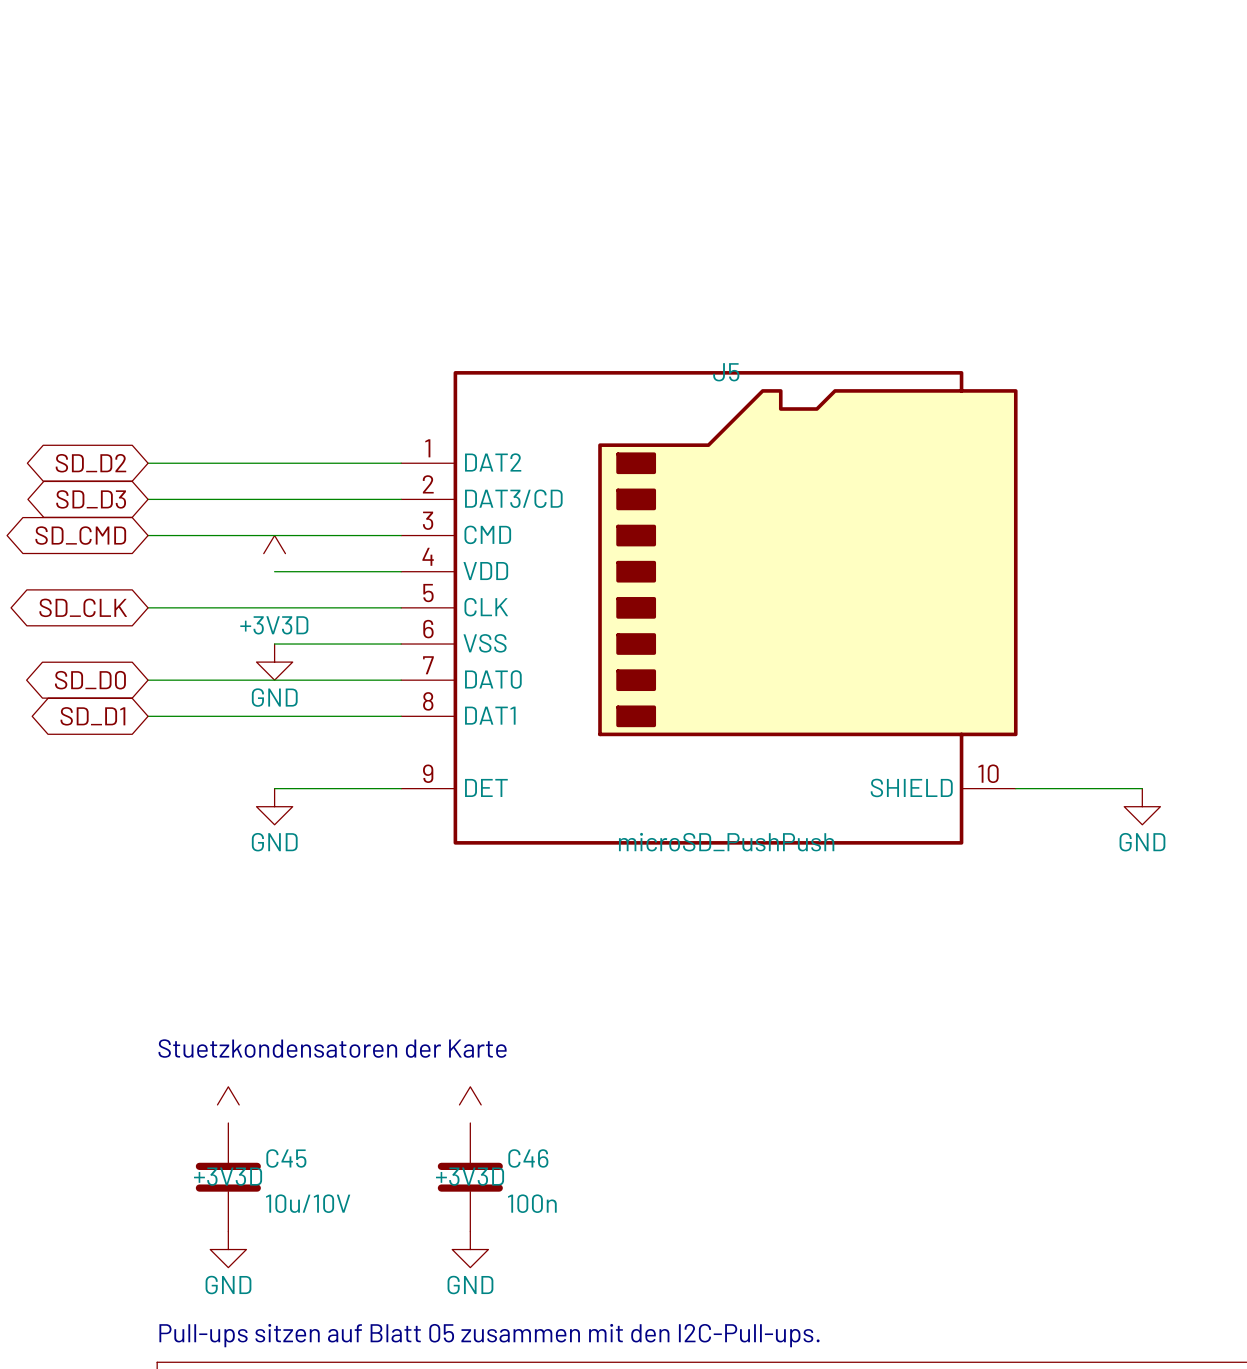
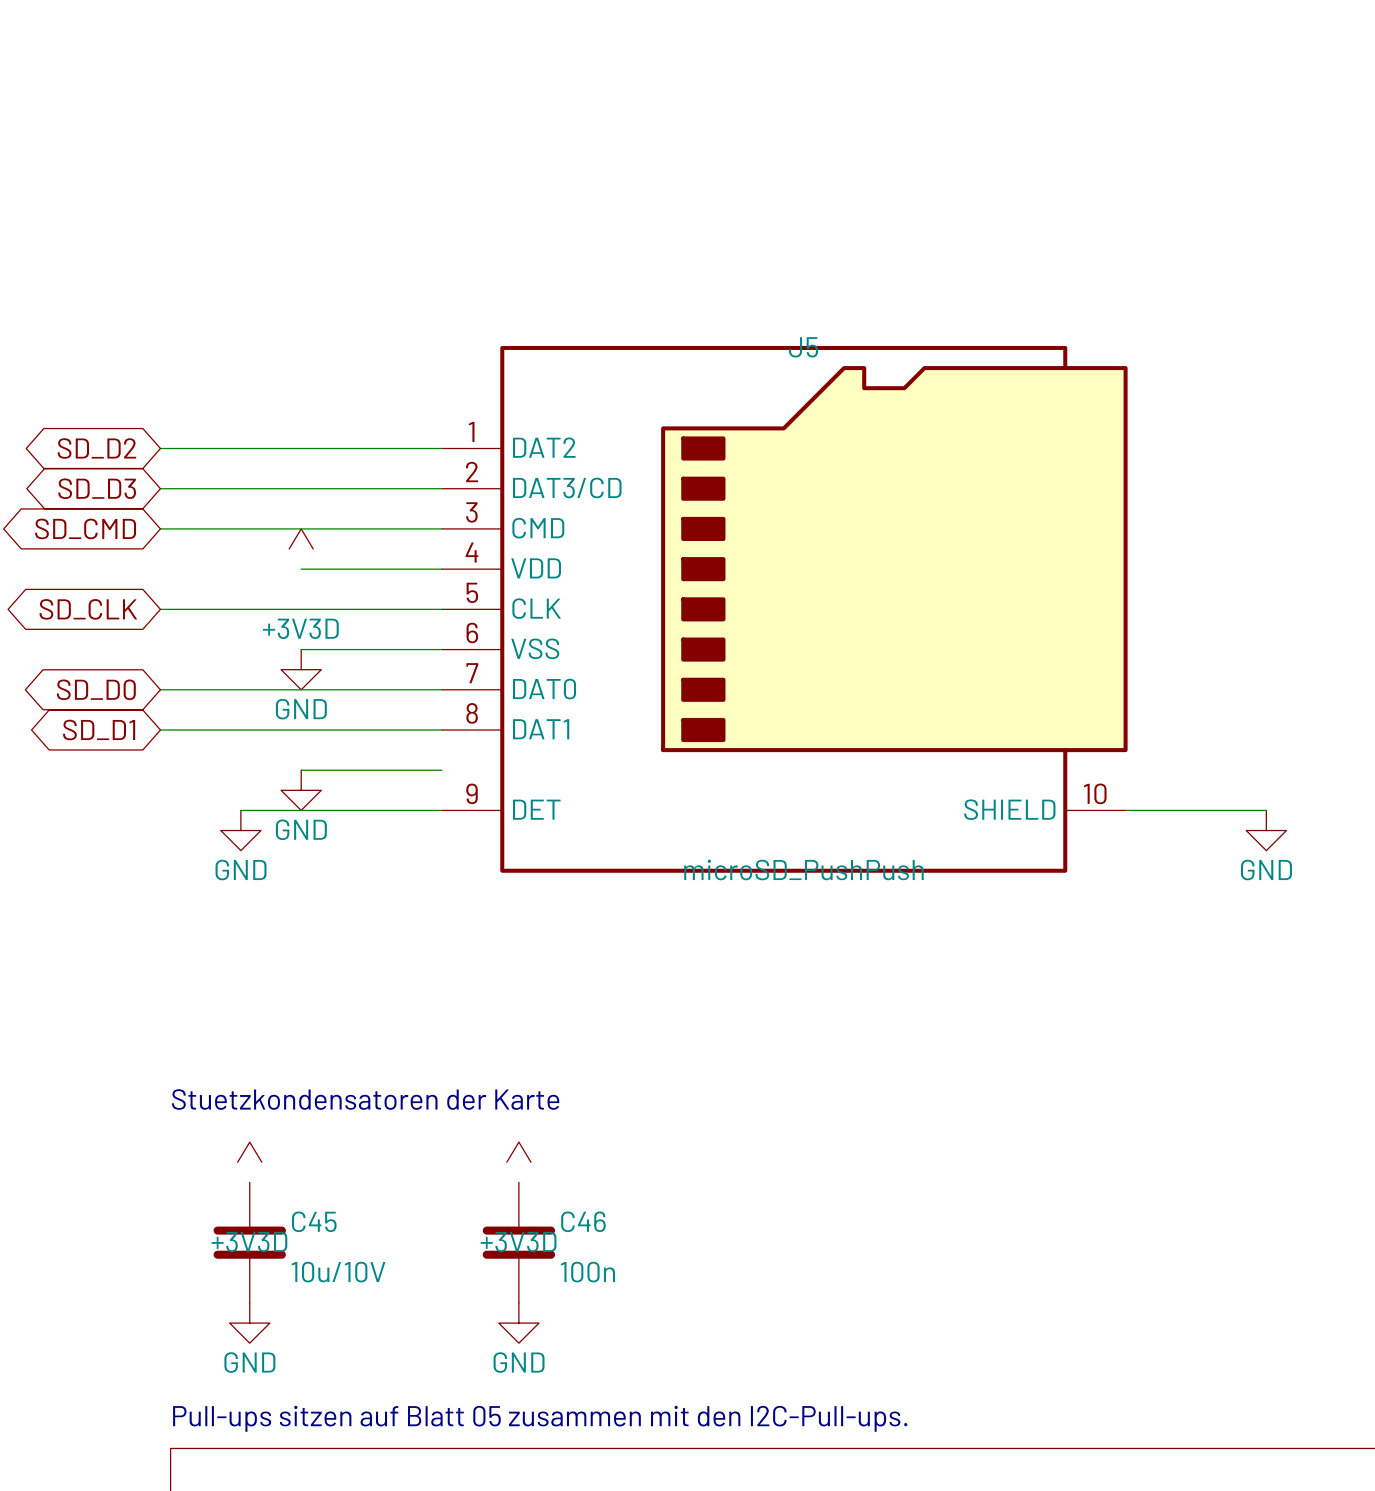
wire: none -> (301, 770) (441, 770)
power symbol: none -> GND (301, 790)
wire: none -> (240, 810) (301, 810)
power symbol: none -> GND (240, 830)
power symbol: GND (274, 806) -> none

